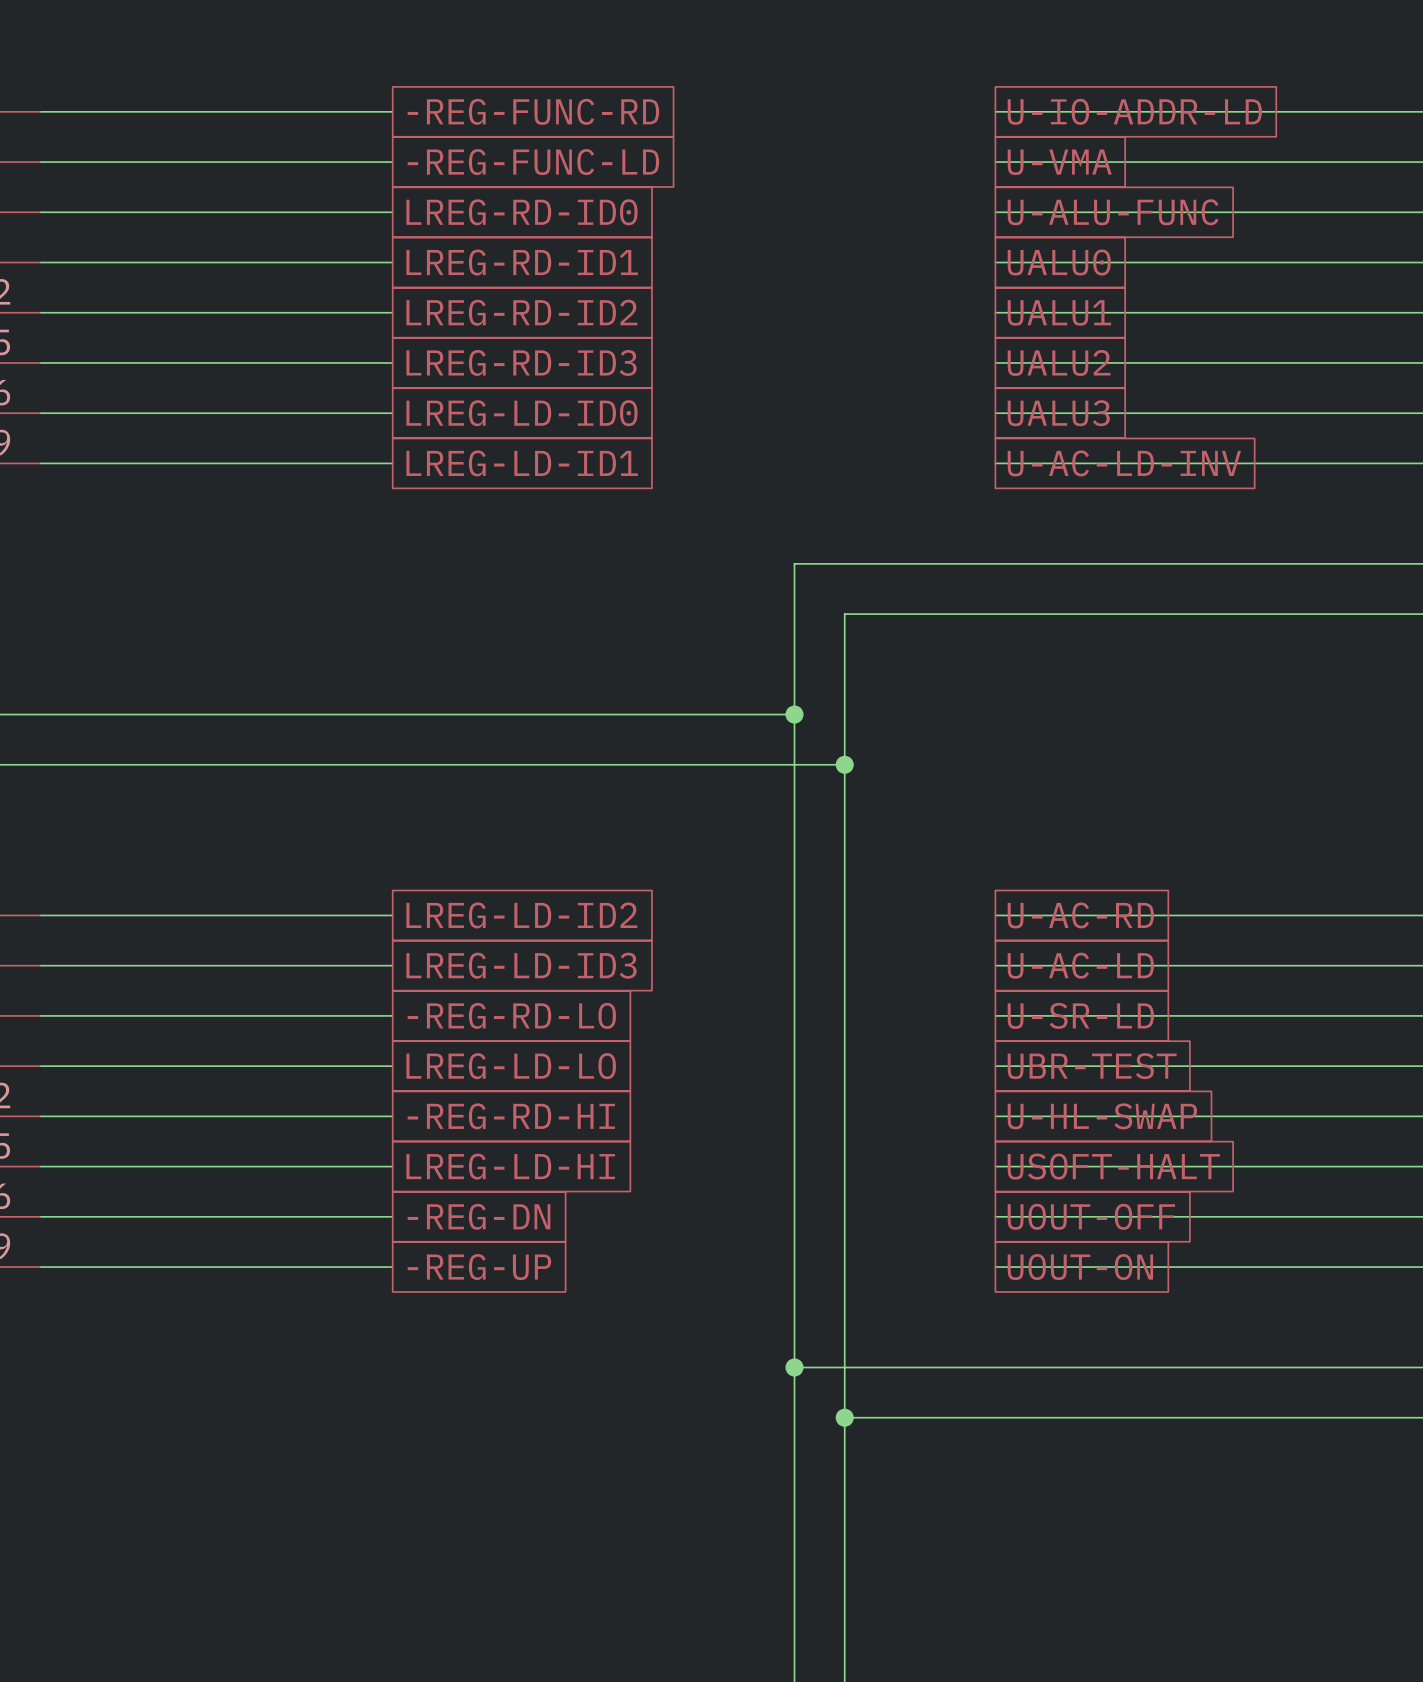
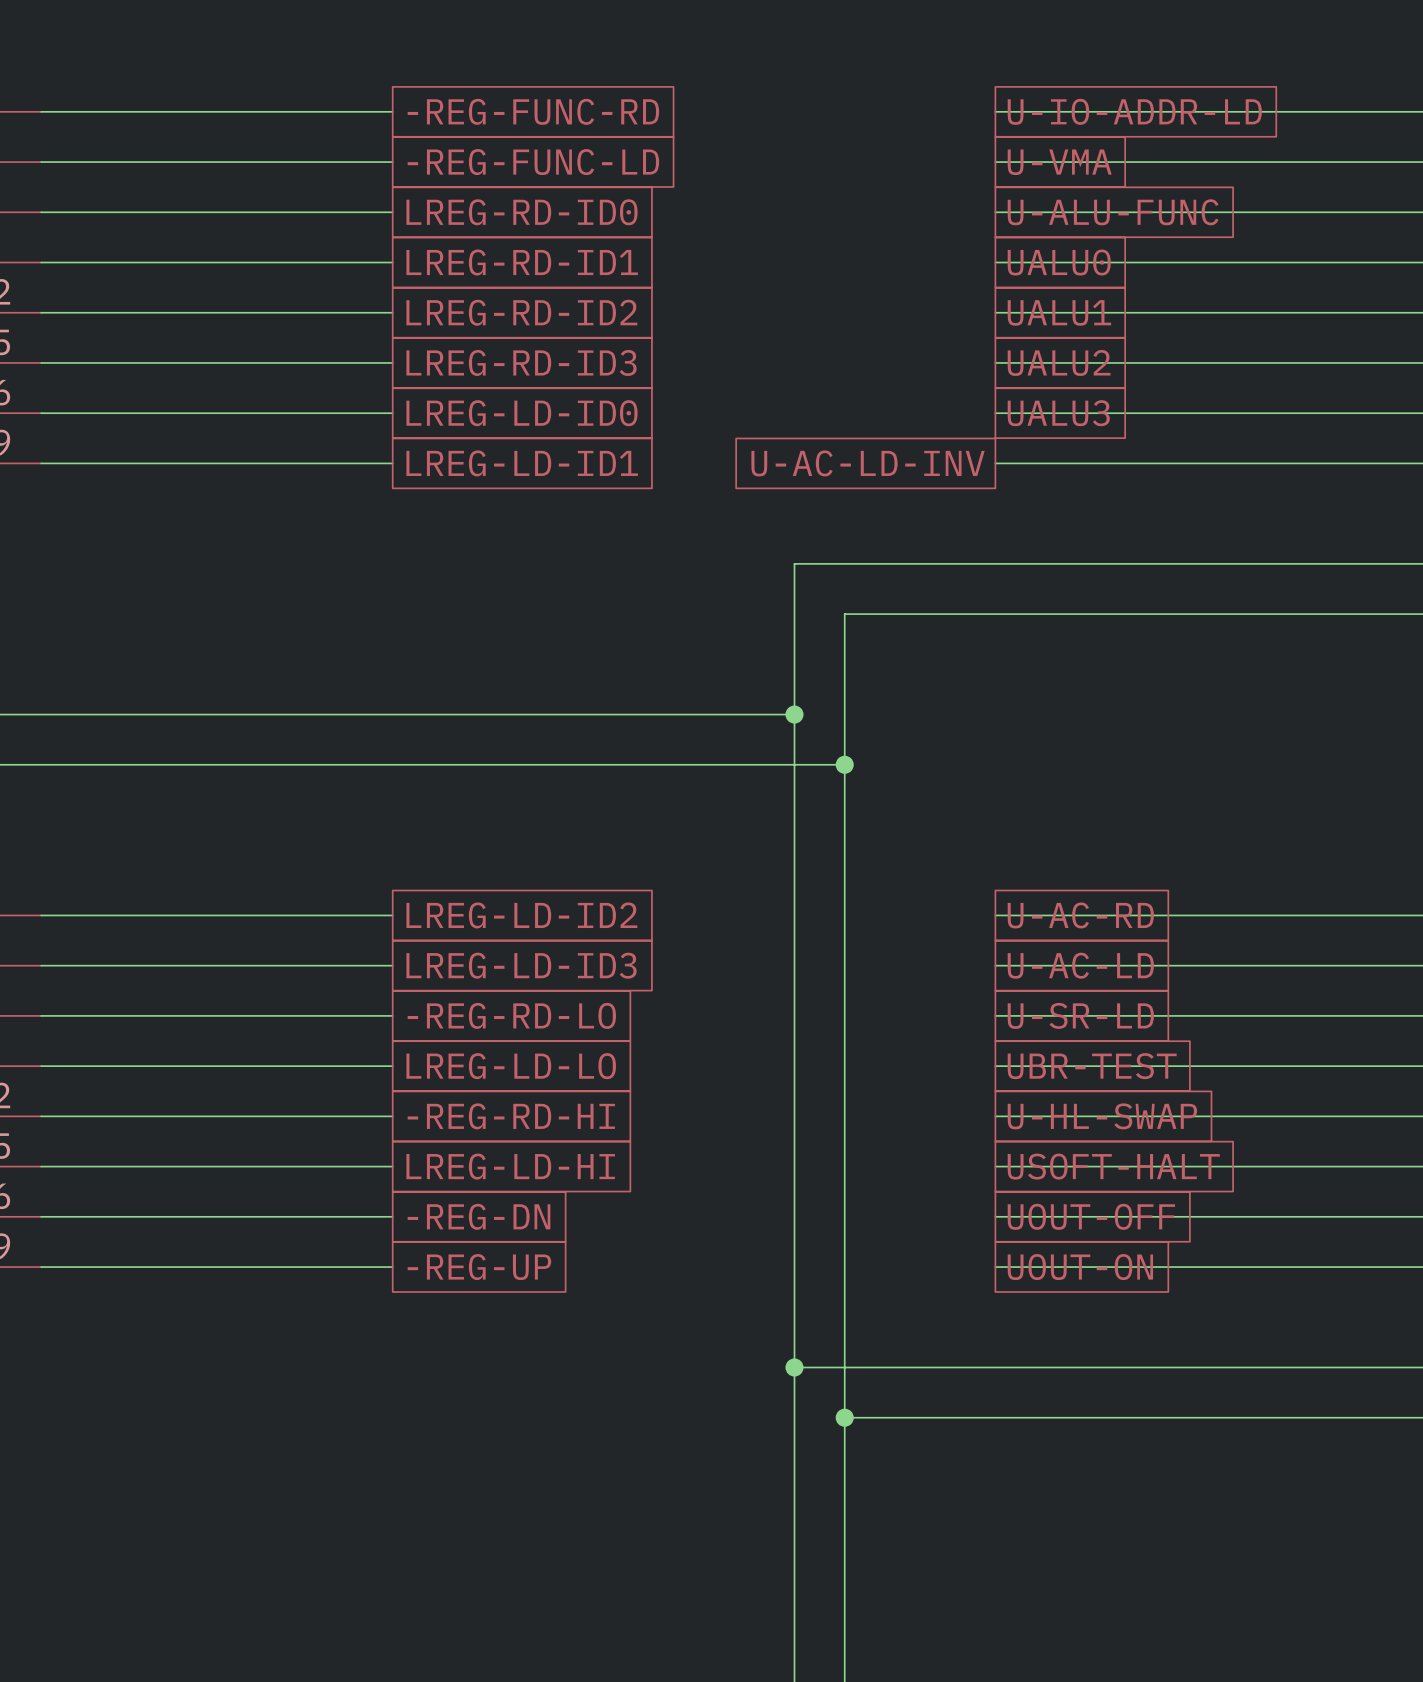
global label rotation: 0° (1124, 463) -> 180° (868, 463)

